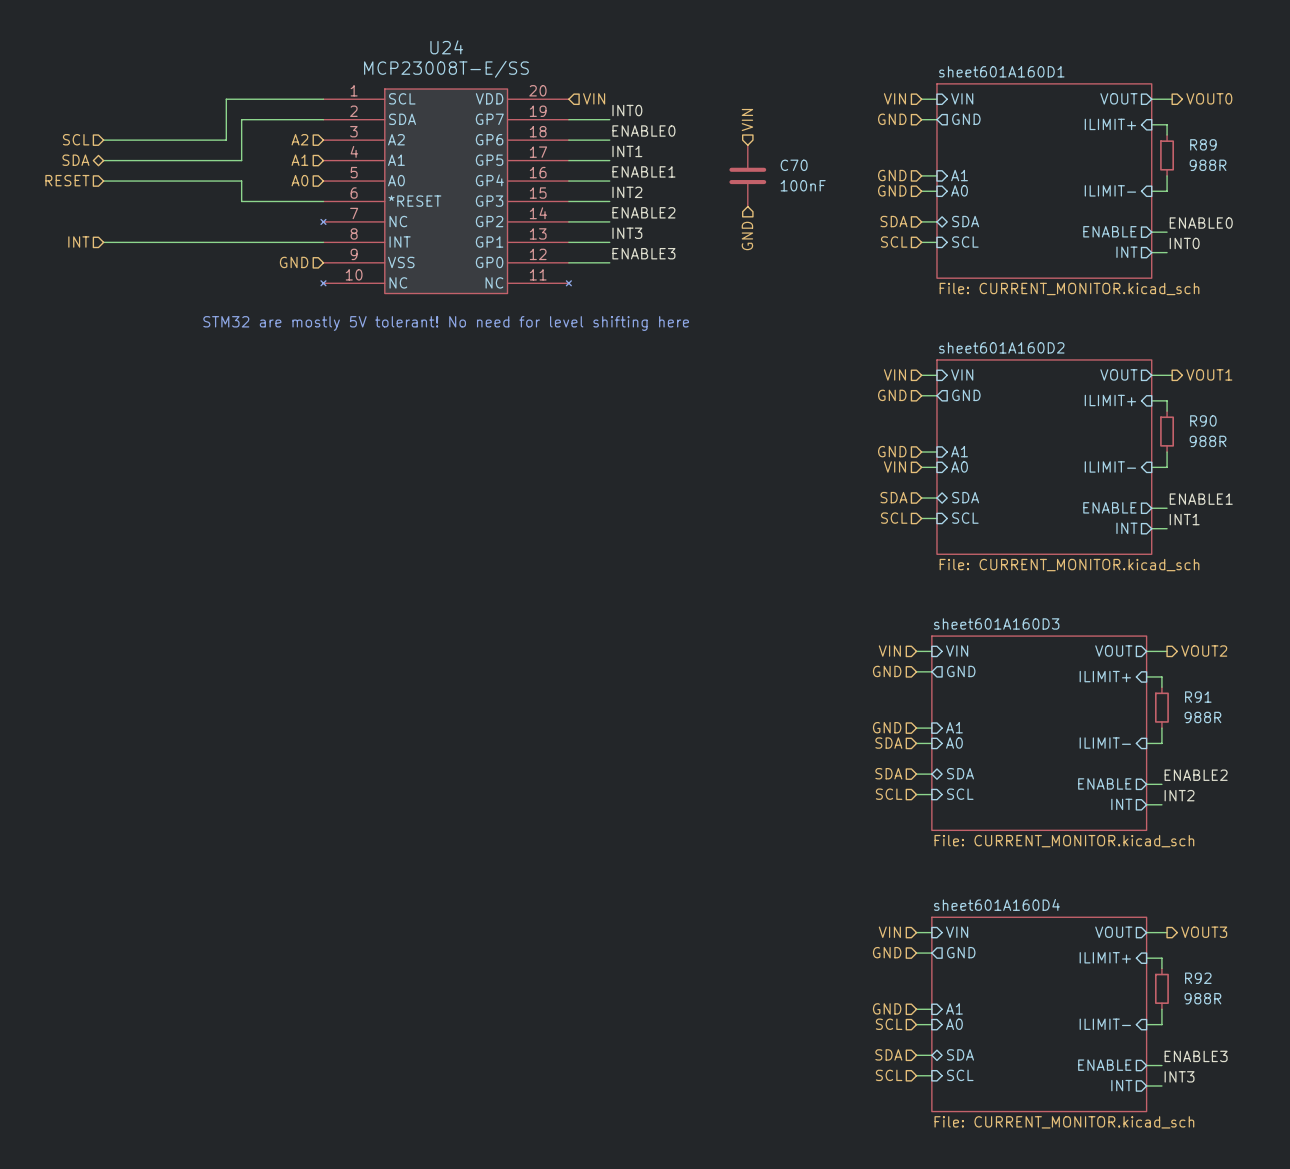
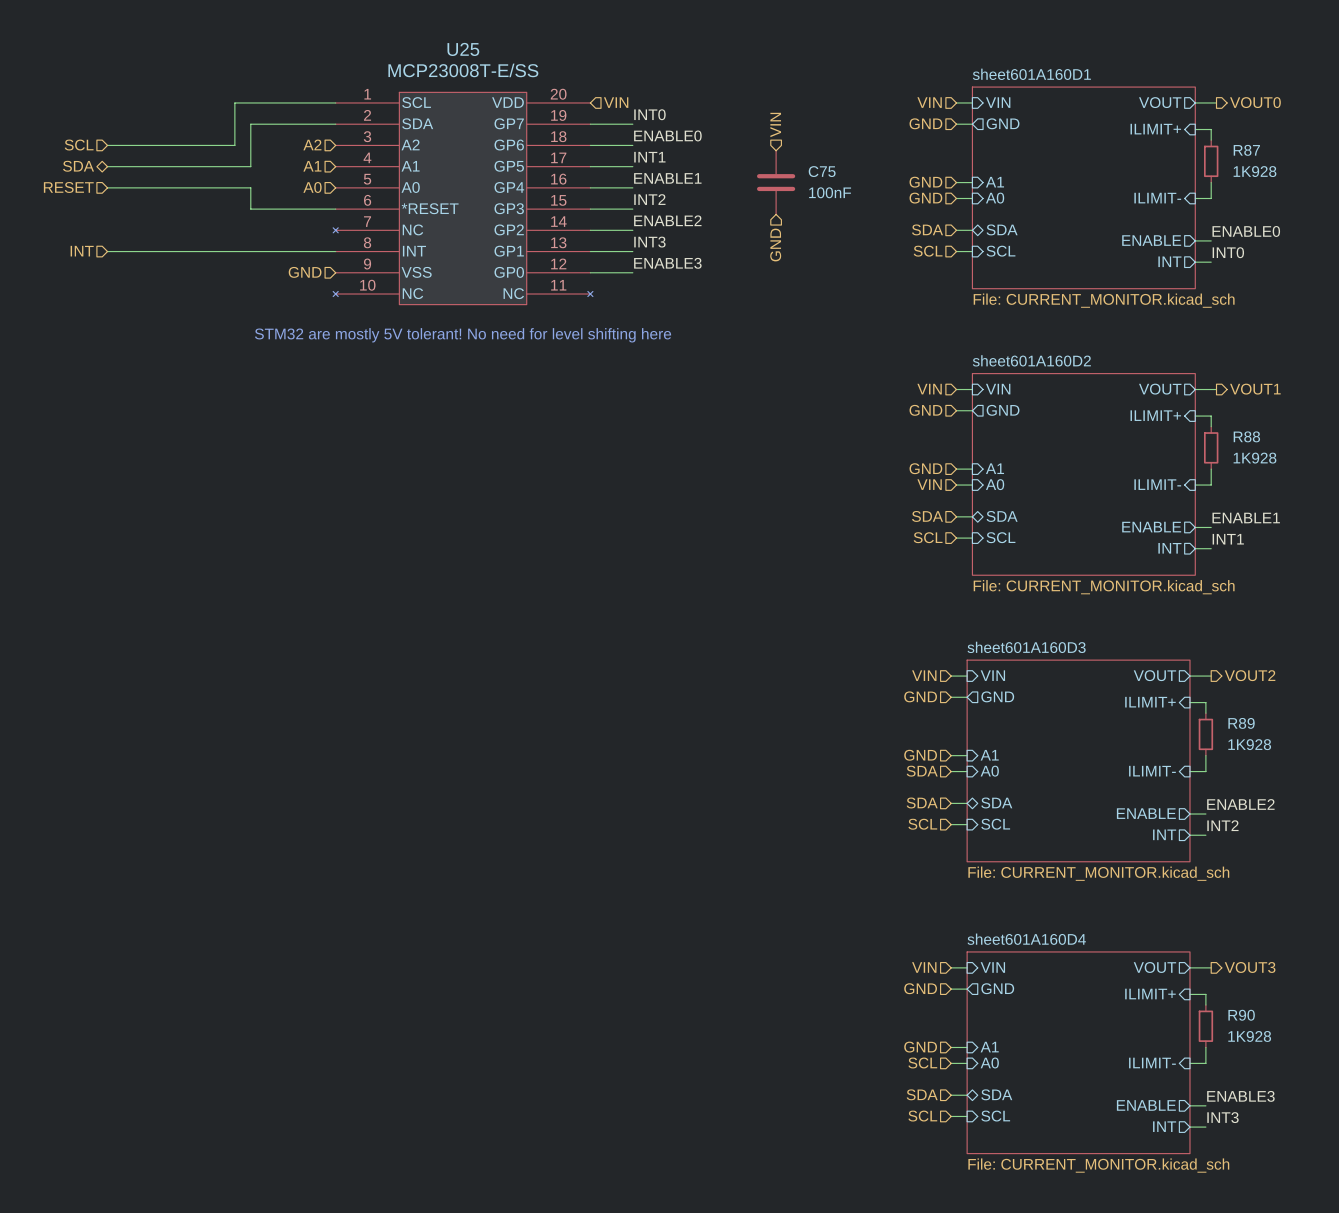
U24 name: U24 (446, 47) -> U25 (463, 49)
R89 name: R89 (1203, 144) -> R87 (1246, 150)
C70 name: C70 (794, 165) -> C75 (822, 171)
R89 value: 988R (1208, 165) -> 1K928 (1254, 171)
R90 name: R90 (1203, 420) -> R88 (1246, 436)
R90 value: 988R (1208, 441) -> 1K928 (1254, 458)
R91 name: R91 (1198, 697) -> R89 (1241, 723)
R91 value: 988R (1202, 717) -> 1K928 (1249, 744)
R92 name: R92 (1198, 978) -> R90 (1241, 1015)
R92 value: 988R (1202, 998) -> 1K928 (1249, 1036)

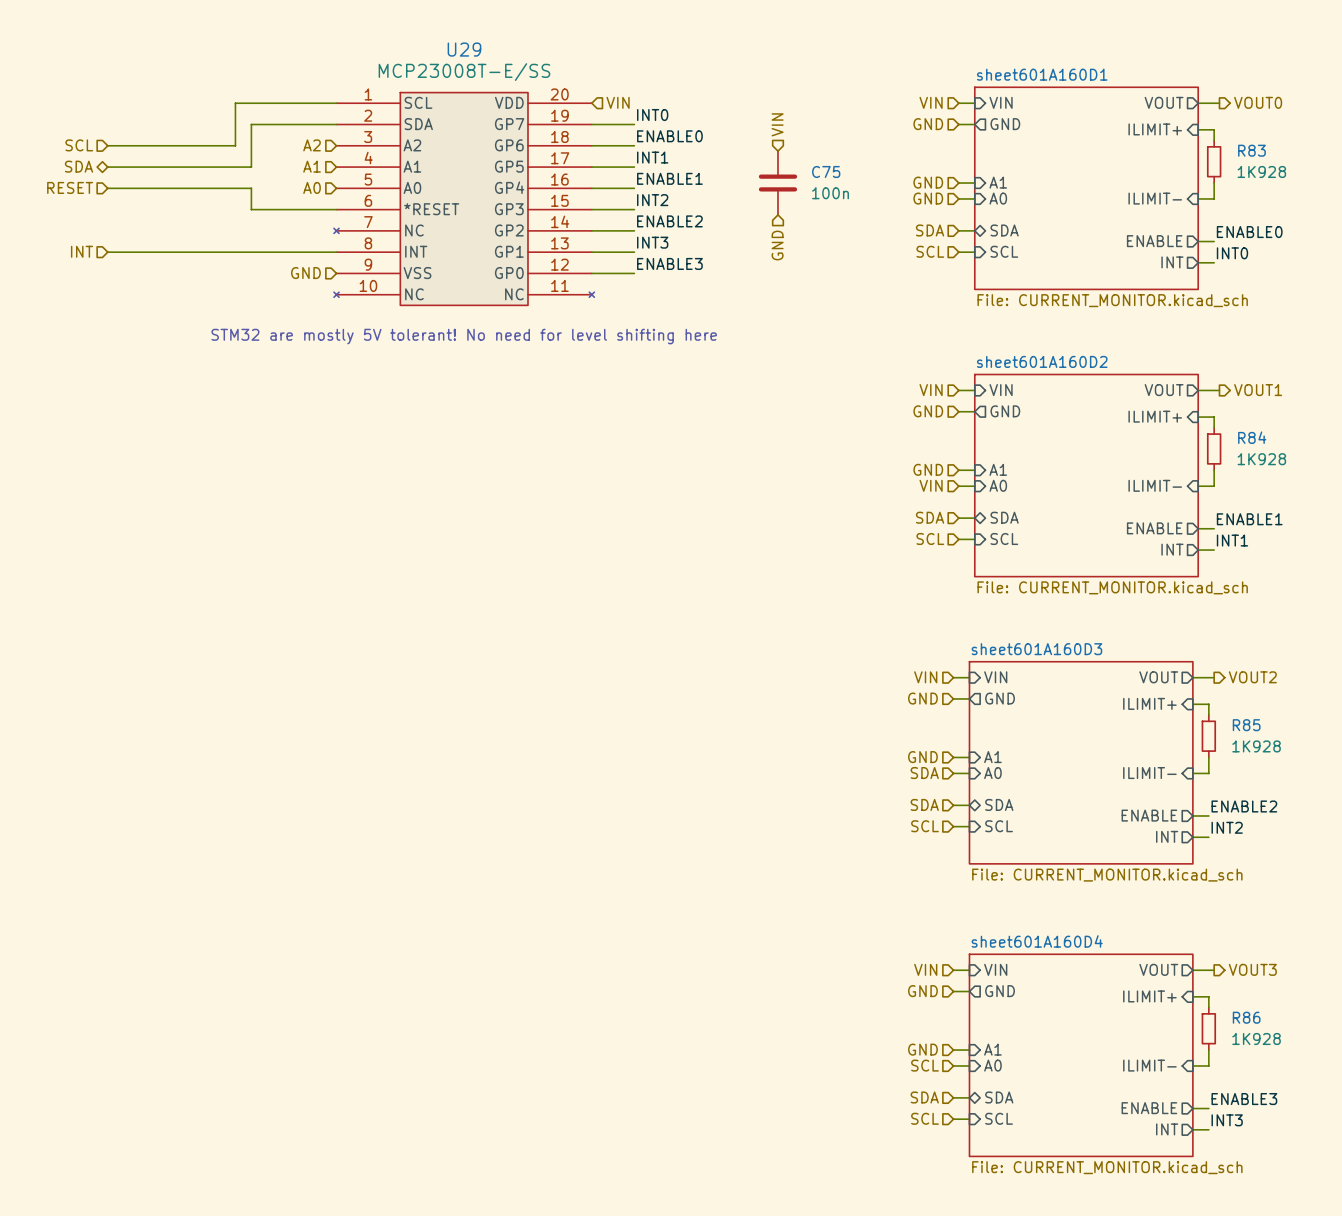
U25 name: U25 (463, 49) -> U29 (464, 49)
R87 name: R87 (1246, 150) -> R83 (1251, 150)
C75 value: 100nF (830, 192) -> 100n (830, 193)
R88 name: R88 (1246, 436) -> R84 (1252, 437)
R89 name: R89 (1241, 723) -> R85 (1246, 725)
R90 name: R90 (1241, 1015) -> R86 (1246, 1017)

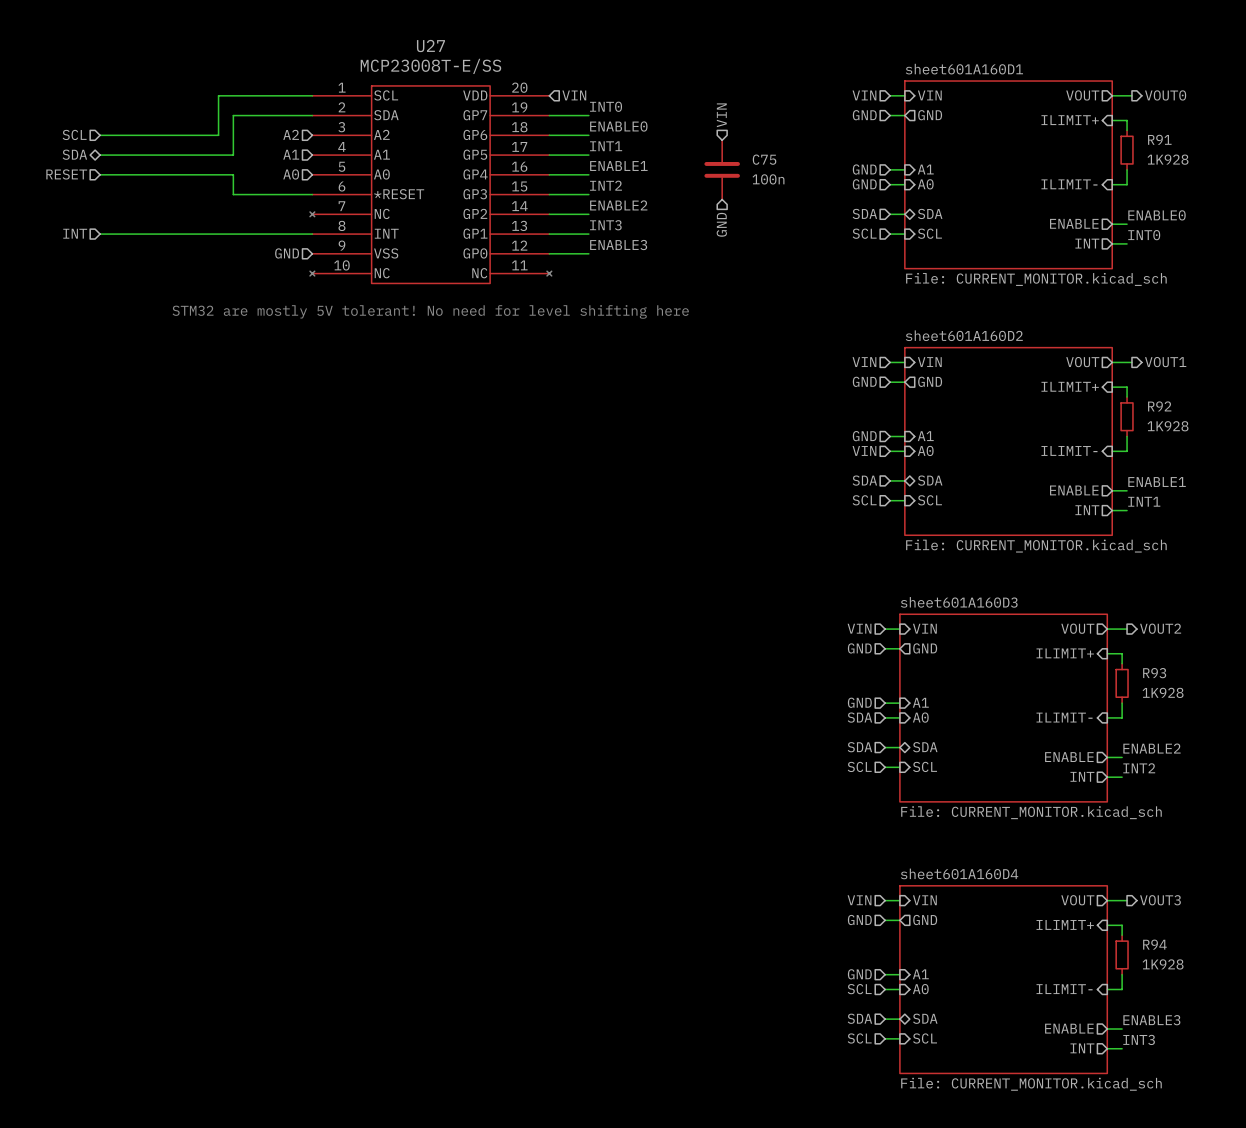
U29 name: U29 (464, 49) -> U27 (430, 46)
R83 name: R83 (1251, 150) -> R91 (1159, 139)
R84 name: R84 (1252, 437) -> R92 (1159, 406)
R85 name: R85 (1246, 725) -> R93 (1154, 673)
R86 name: R86 (1246, 1017) -> R94 (1154, 944)

